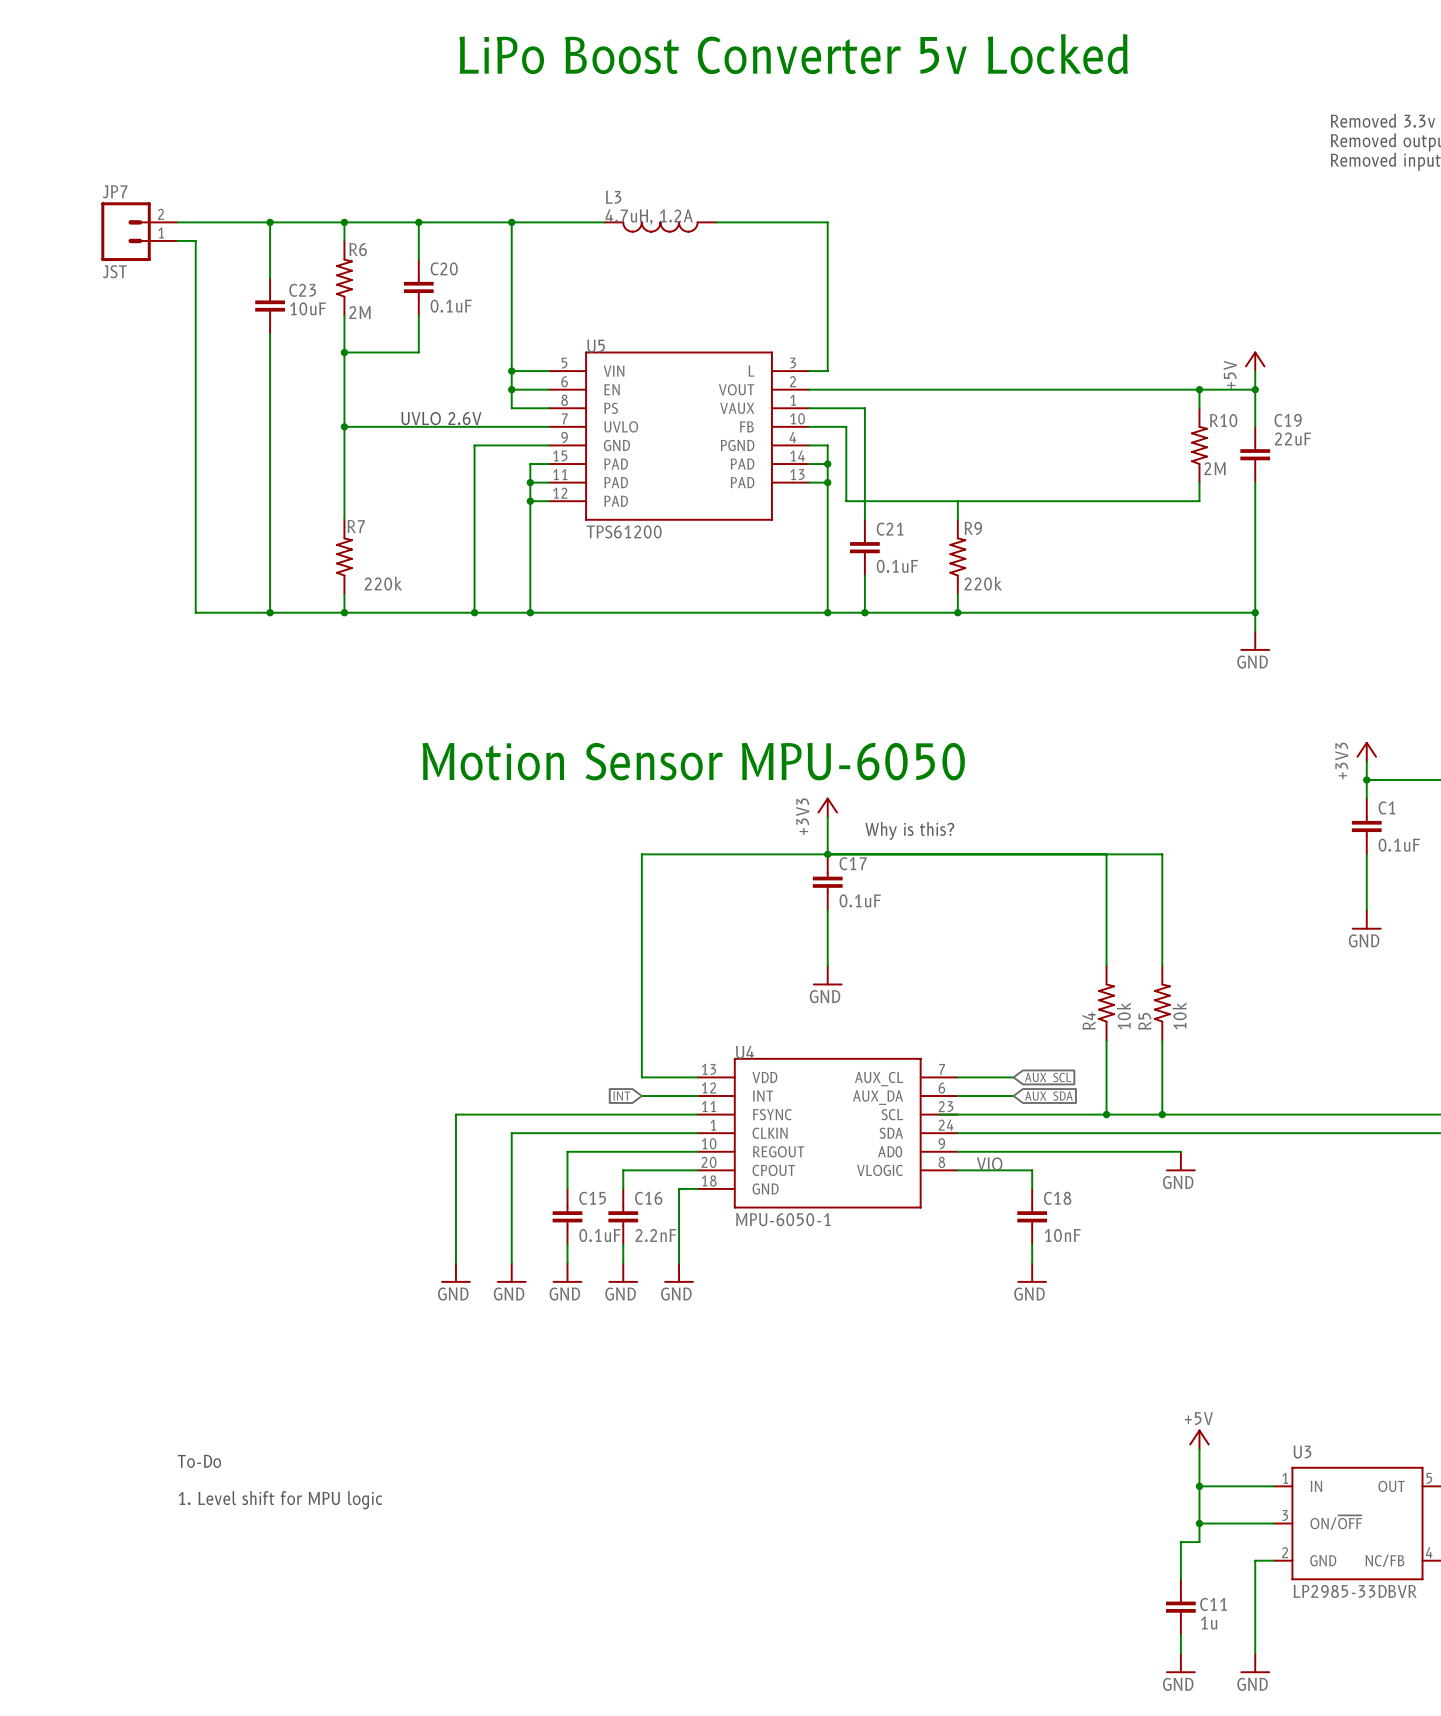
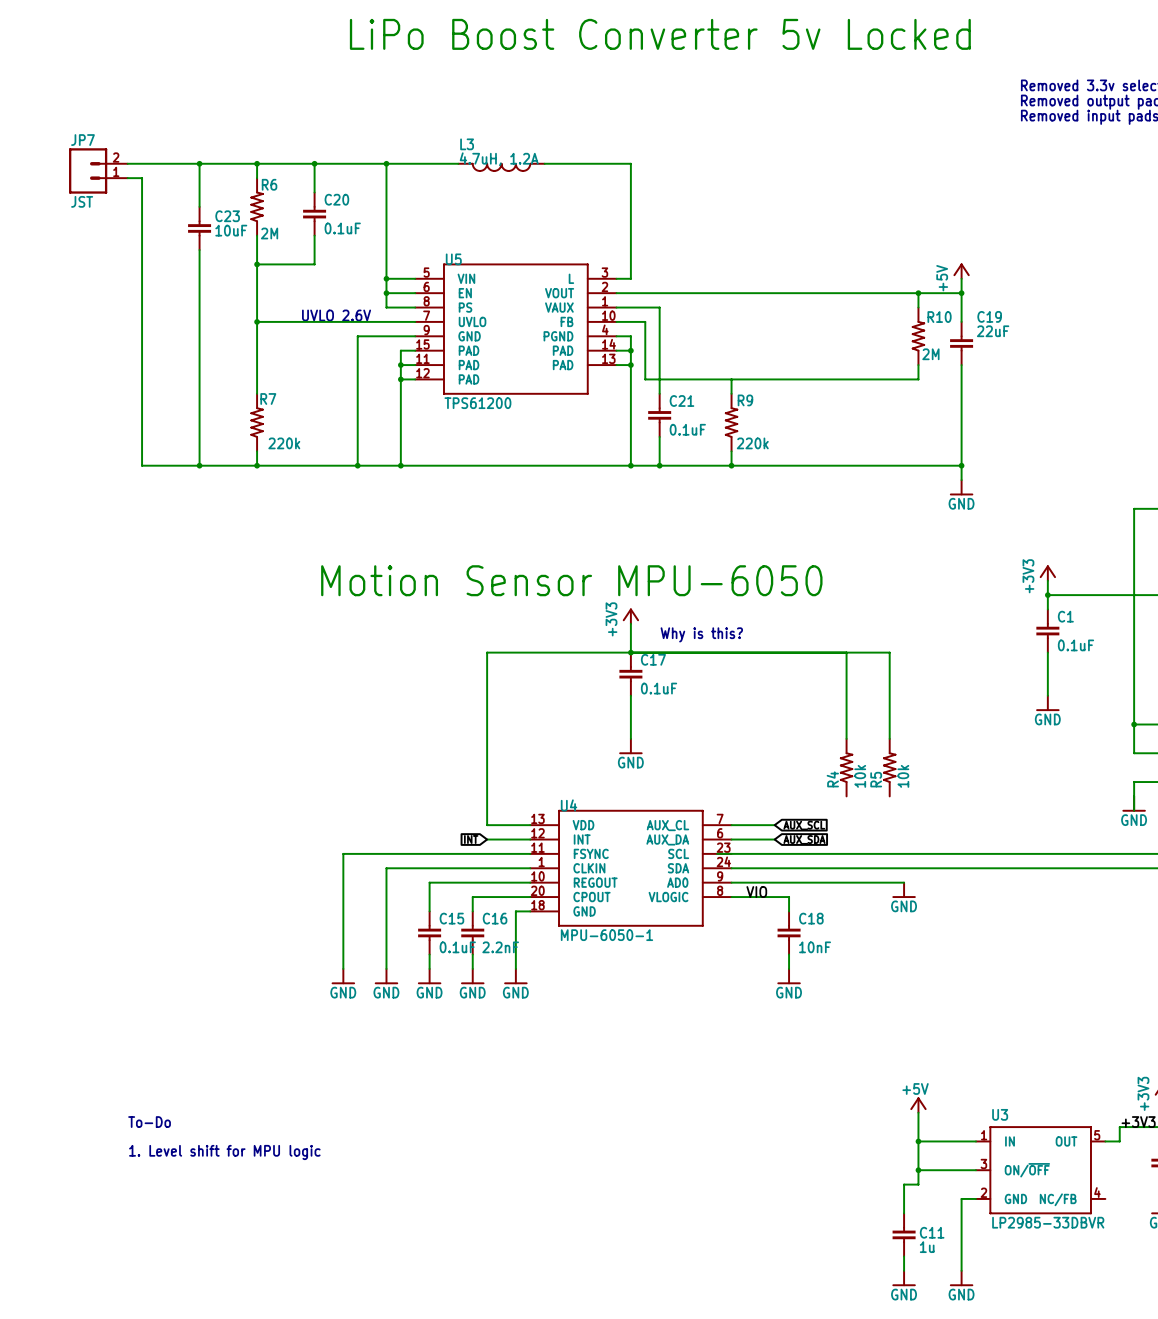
wire: (1106, 1040) (1106, 1114) -> none
wire: (1162, 1040) (1162, 1114) -> none
junction: (1106, 1114) -> none
junction: (1162, 1114) -> none

